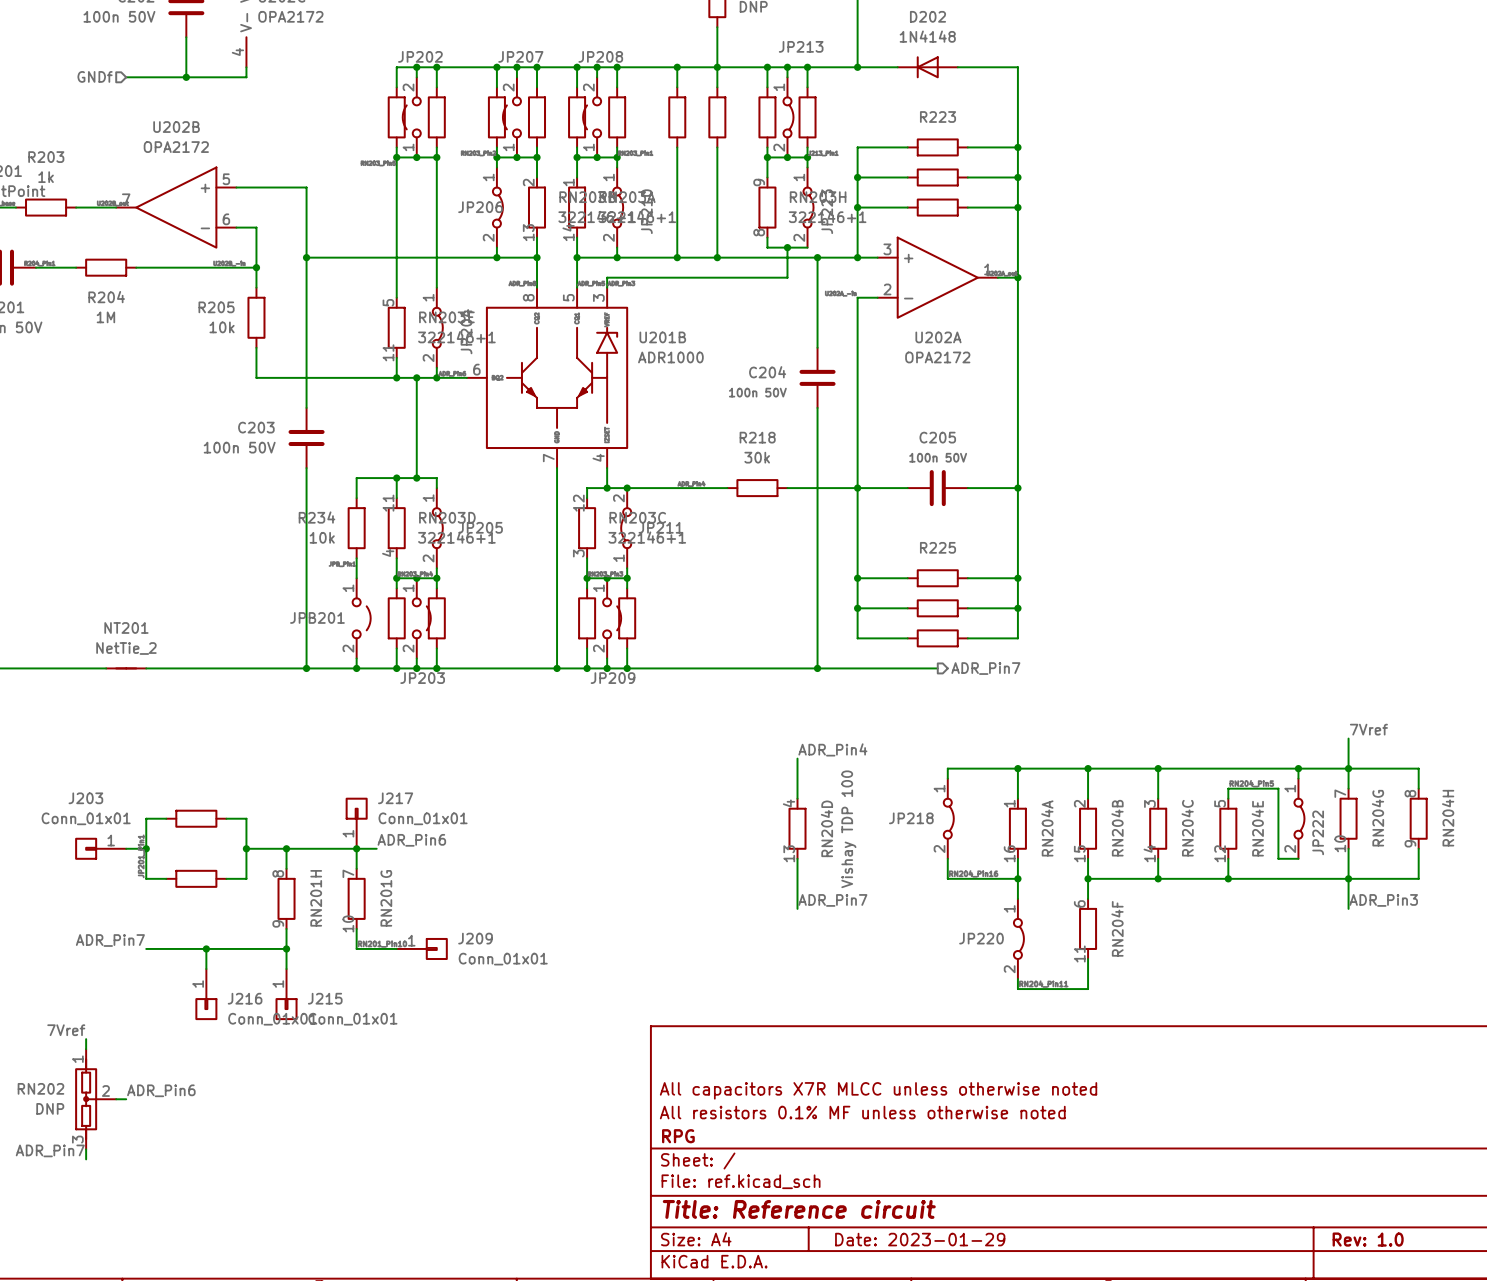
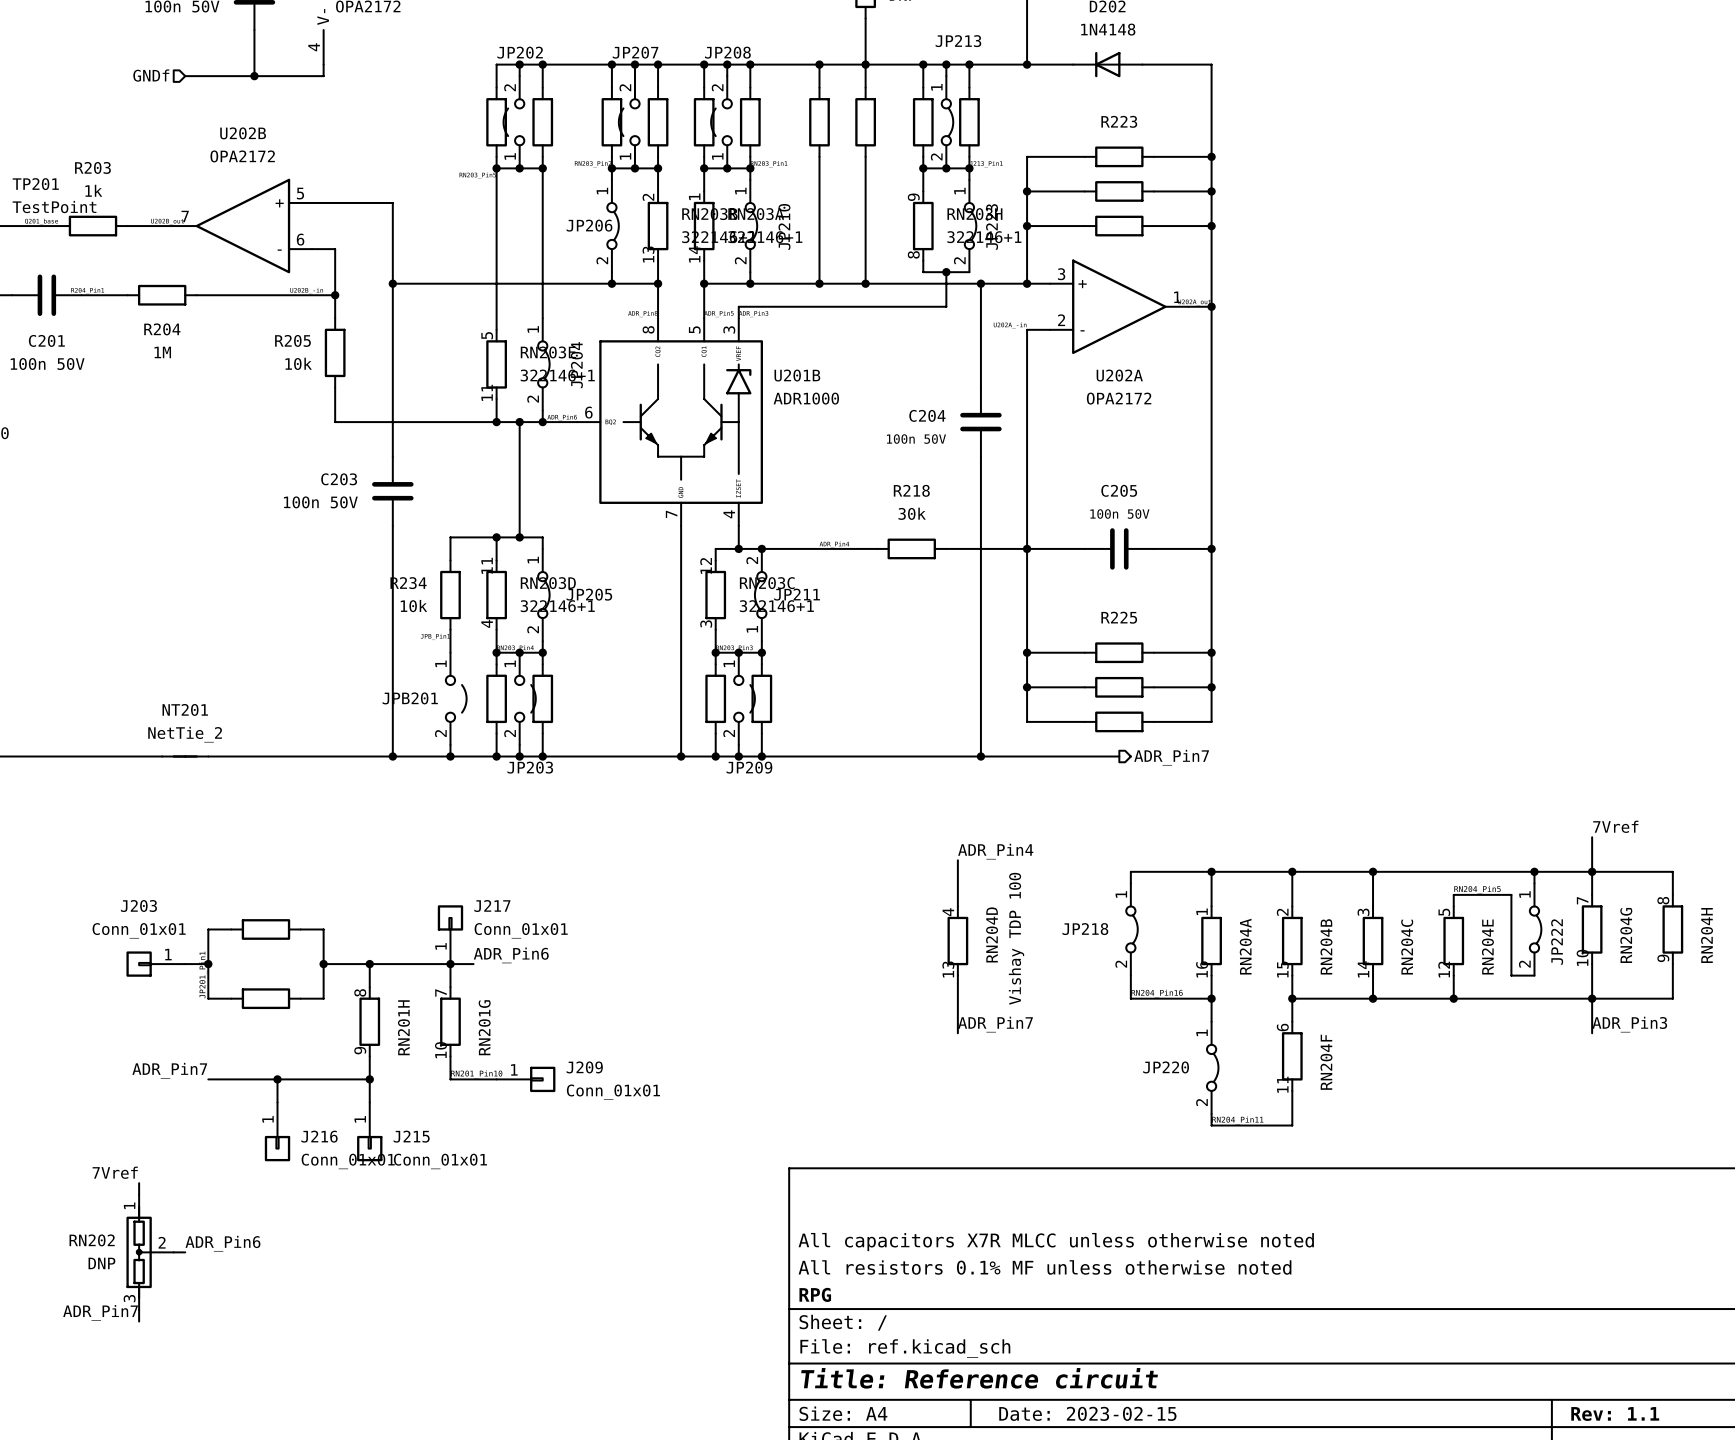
title block: Date: 2023-01-29 (920, 1239) -> Date: 2023-02-15 (1087, 1413)
title block: Rev: 1.0 (1368, 1239) -> Rev: 1.1 (1615, 1413)

